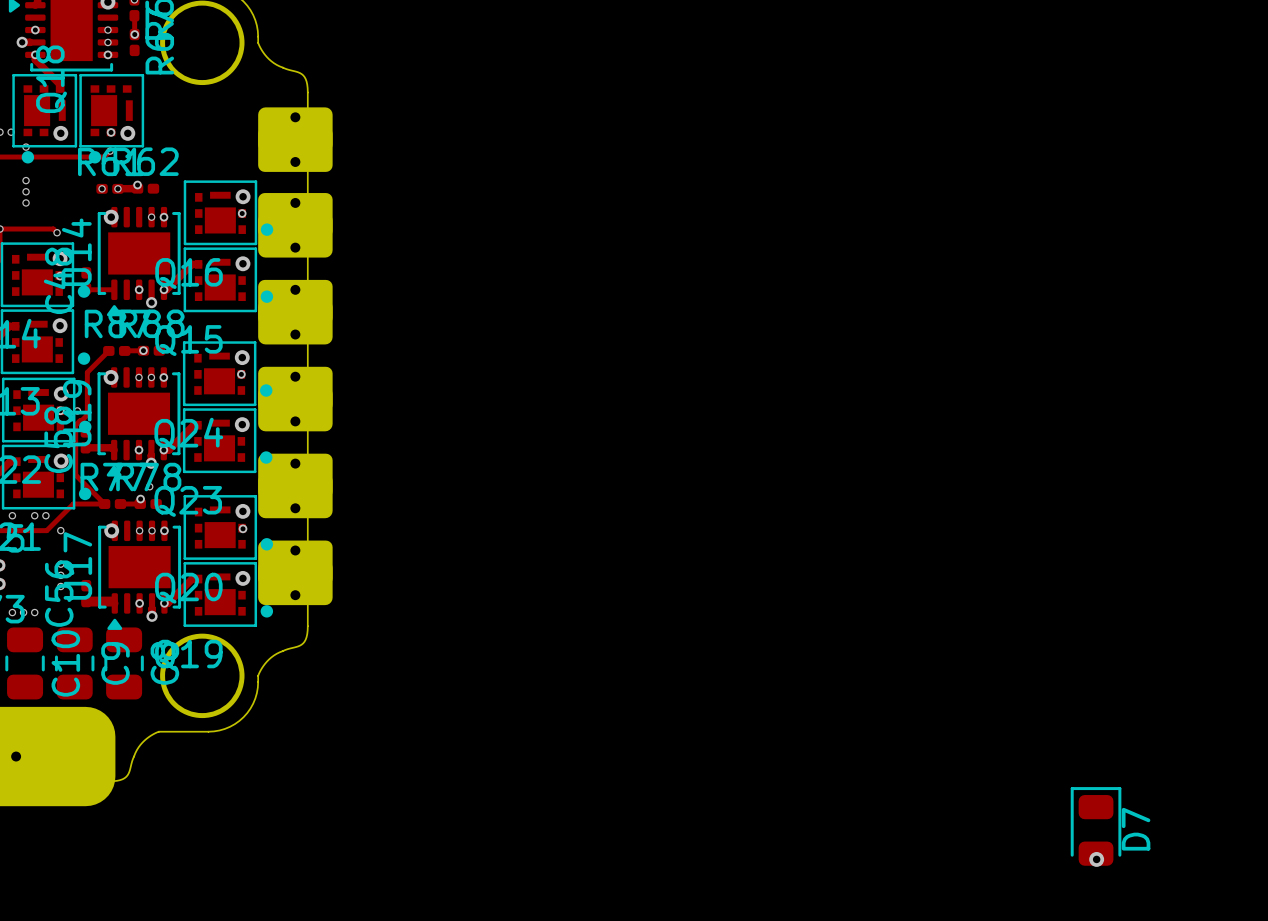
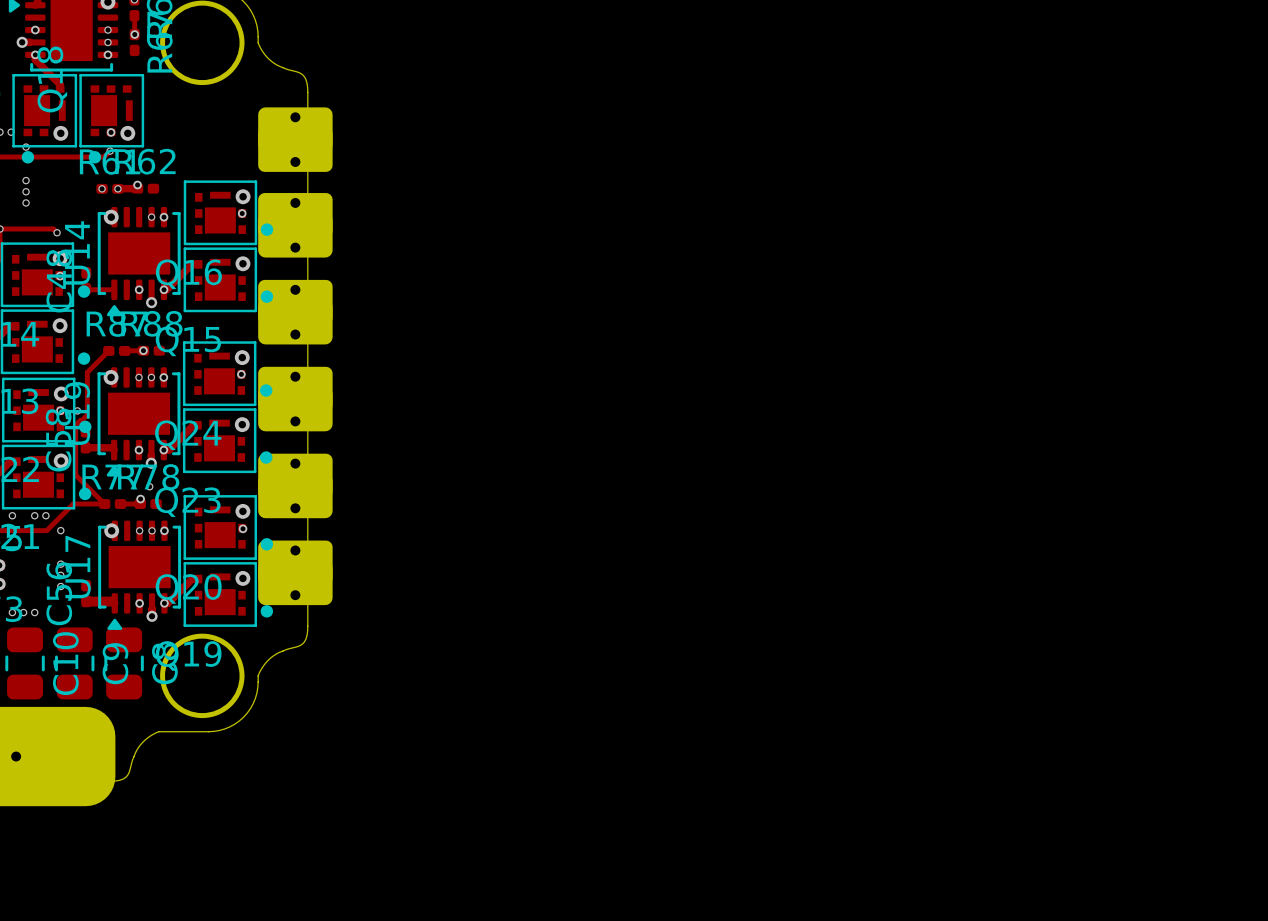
D7: (1096, 826) -> none
via: (1096, 859) -> none

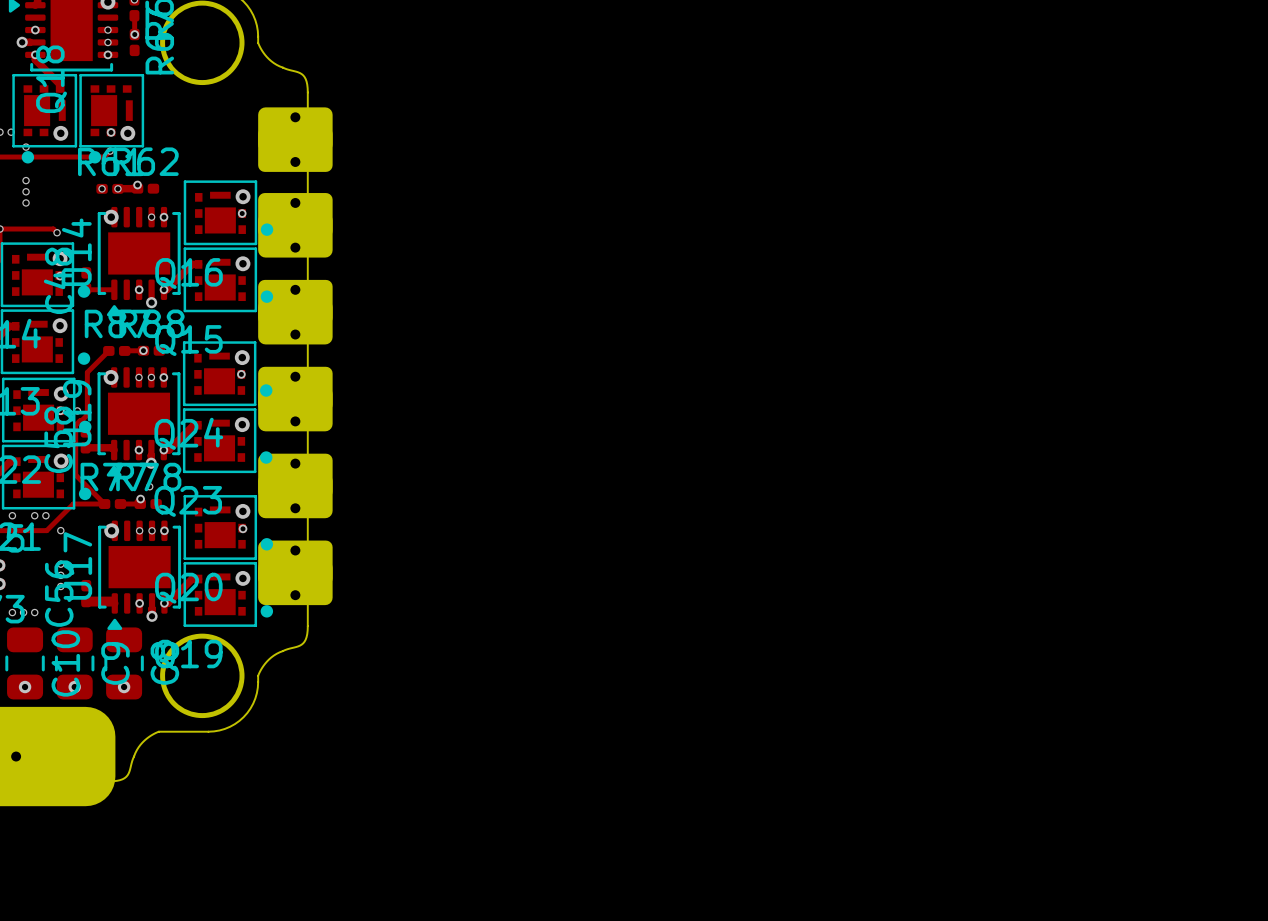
via: none -> (25, 687)
via: none -> (74, 687)
via: none -> (124, 687)

